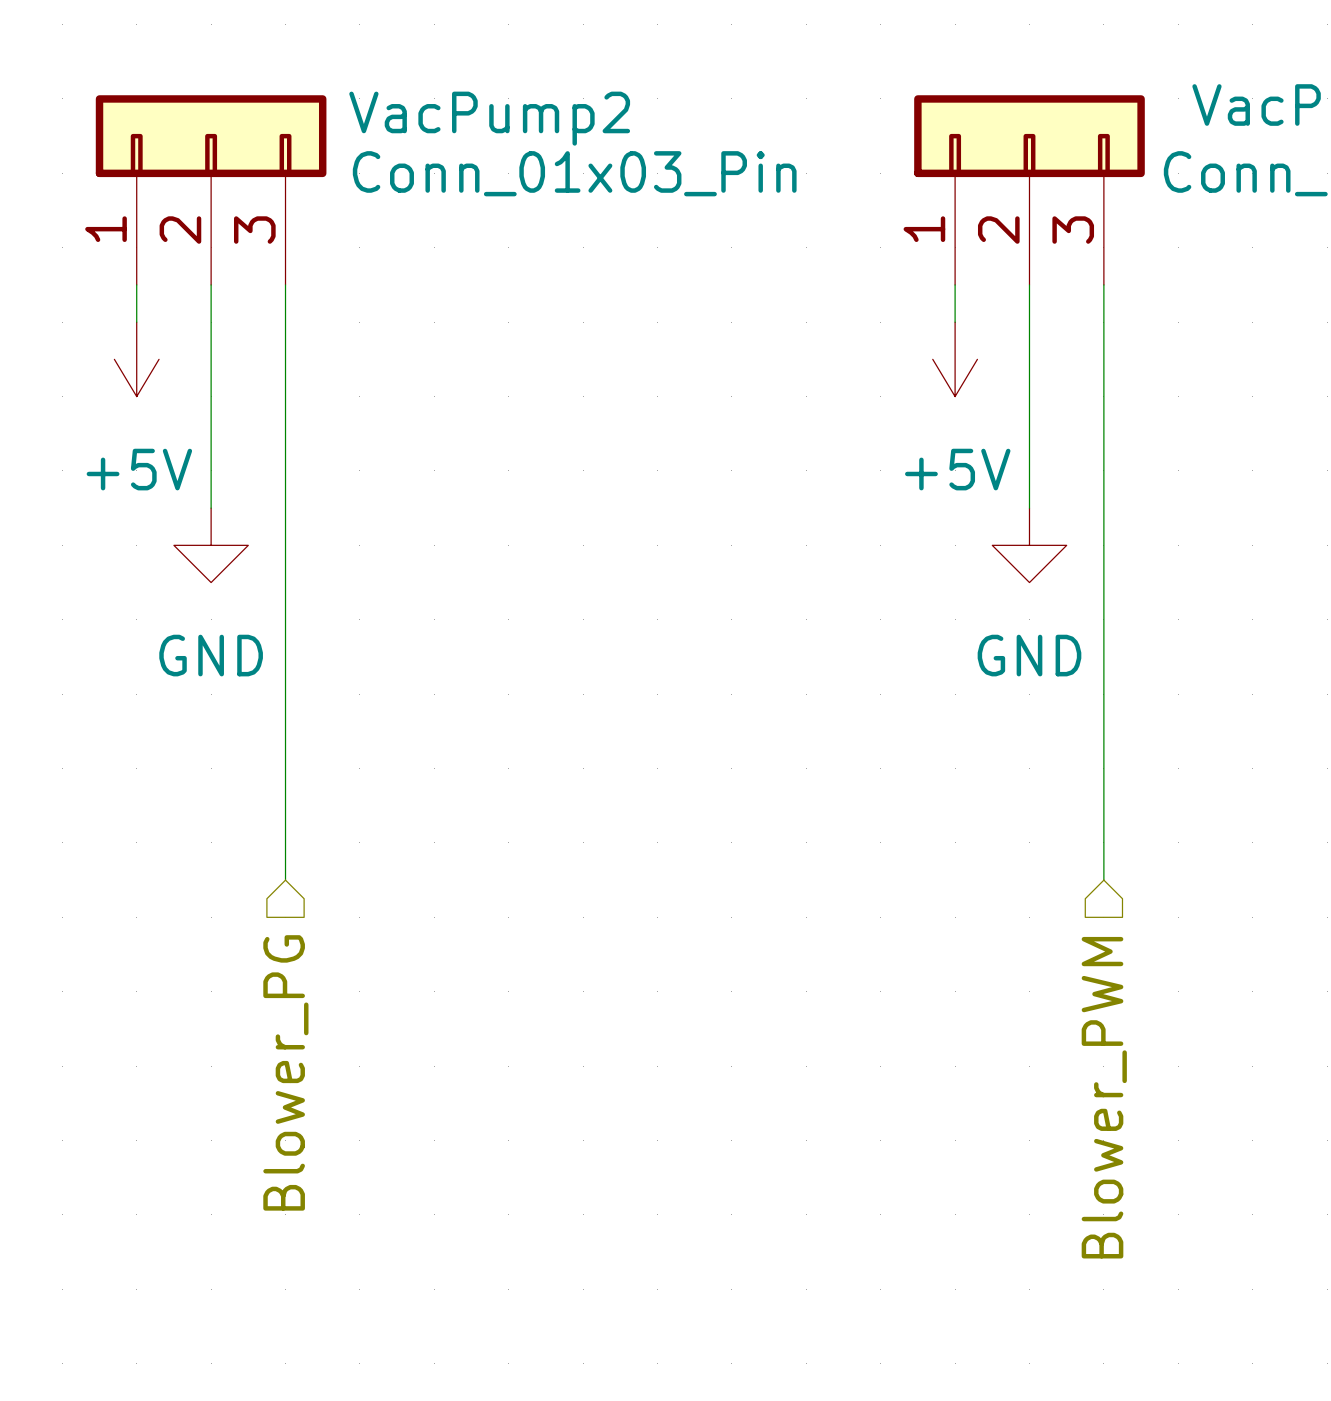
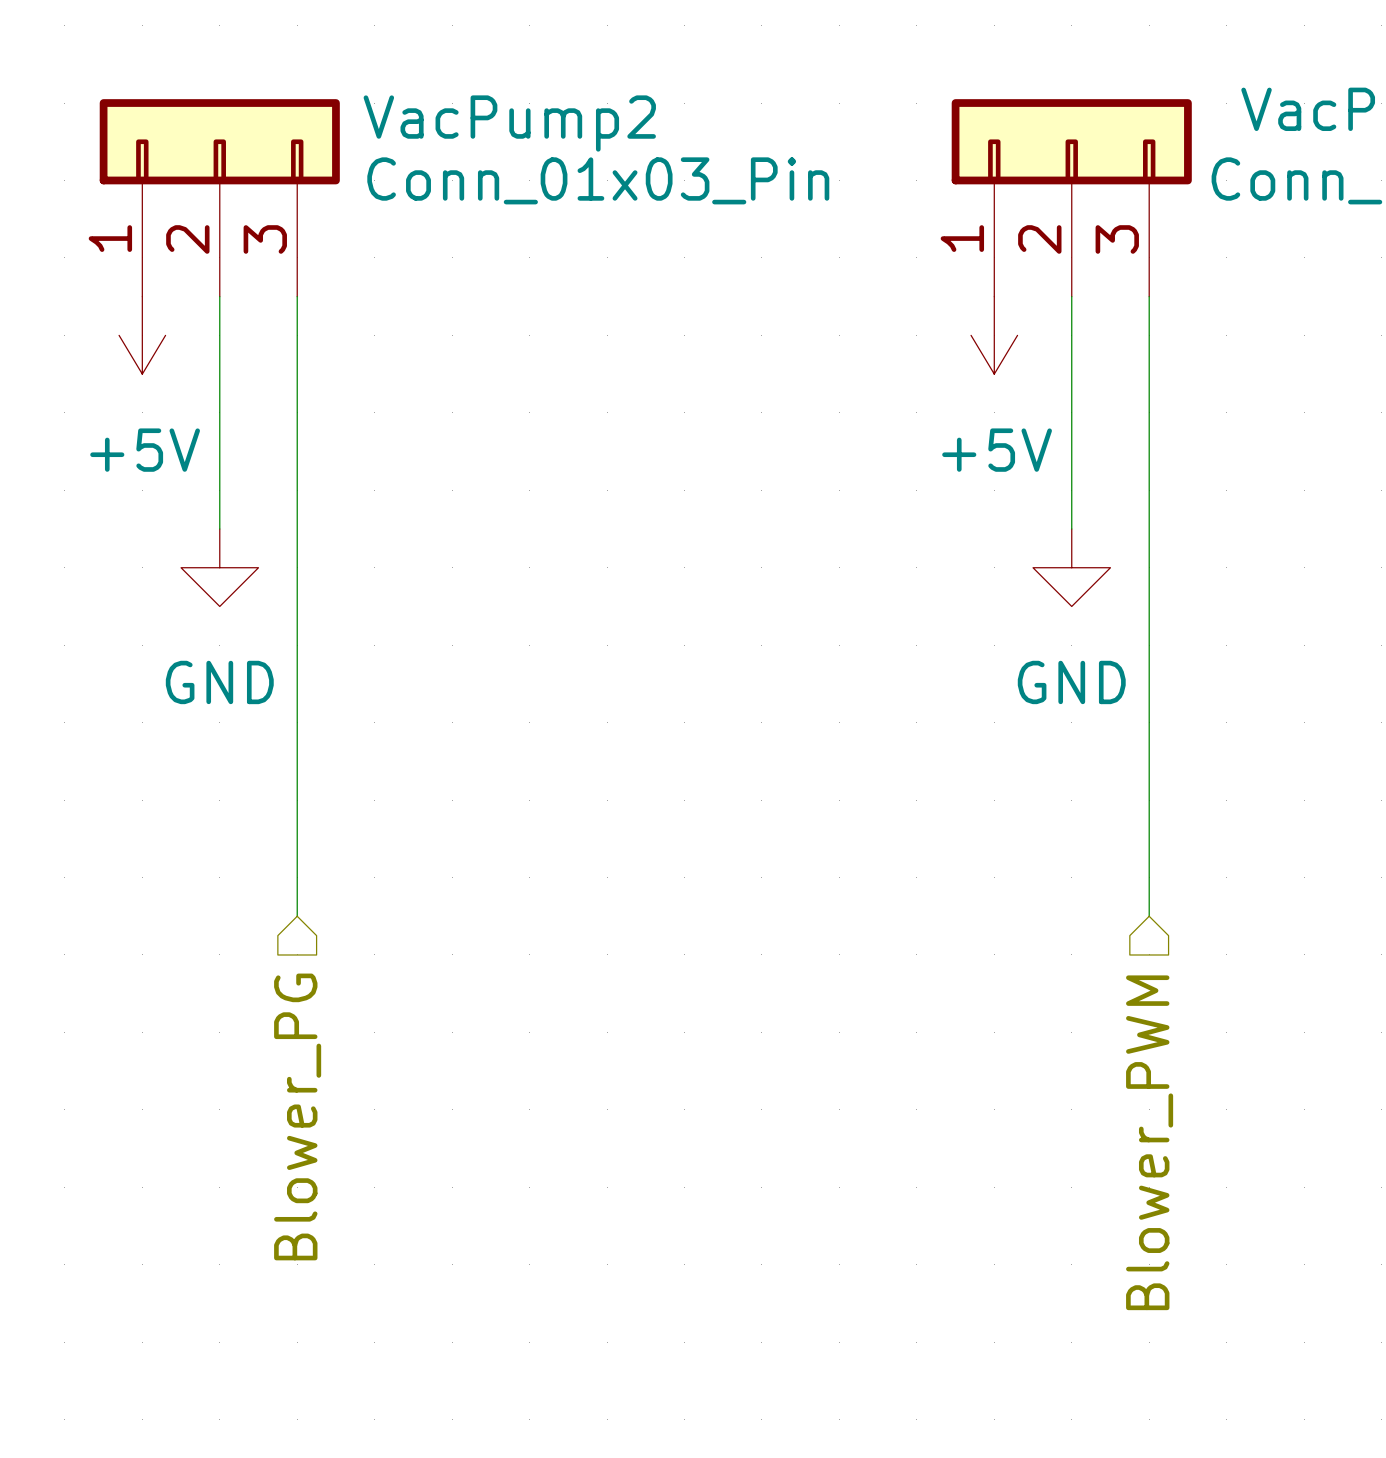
power symbol position: +5V (136, 359) -> +5V (142, 335)
power symbol position: +5V (955, 359) -> +5V (994, 335)

